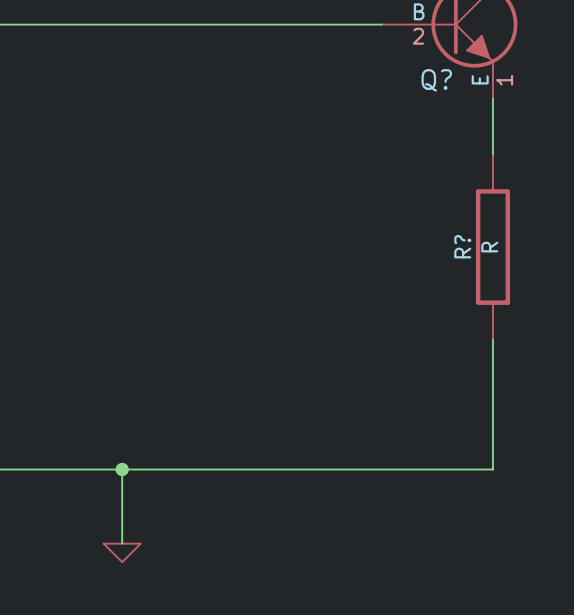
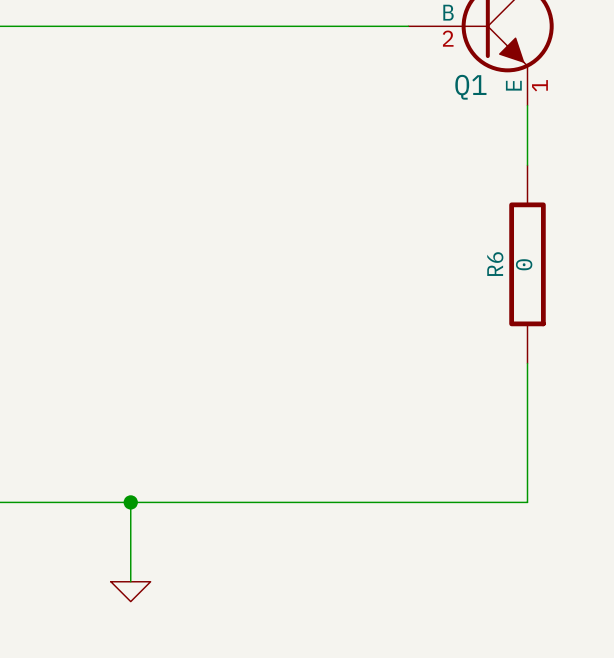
Q? name: Q? (436, 80) -> Q1 (470, 87)
R? name: R? (462, 246) -> R6 (495, 264)
R? value: R (489, 247) -> 0 (524, 264)

